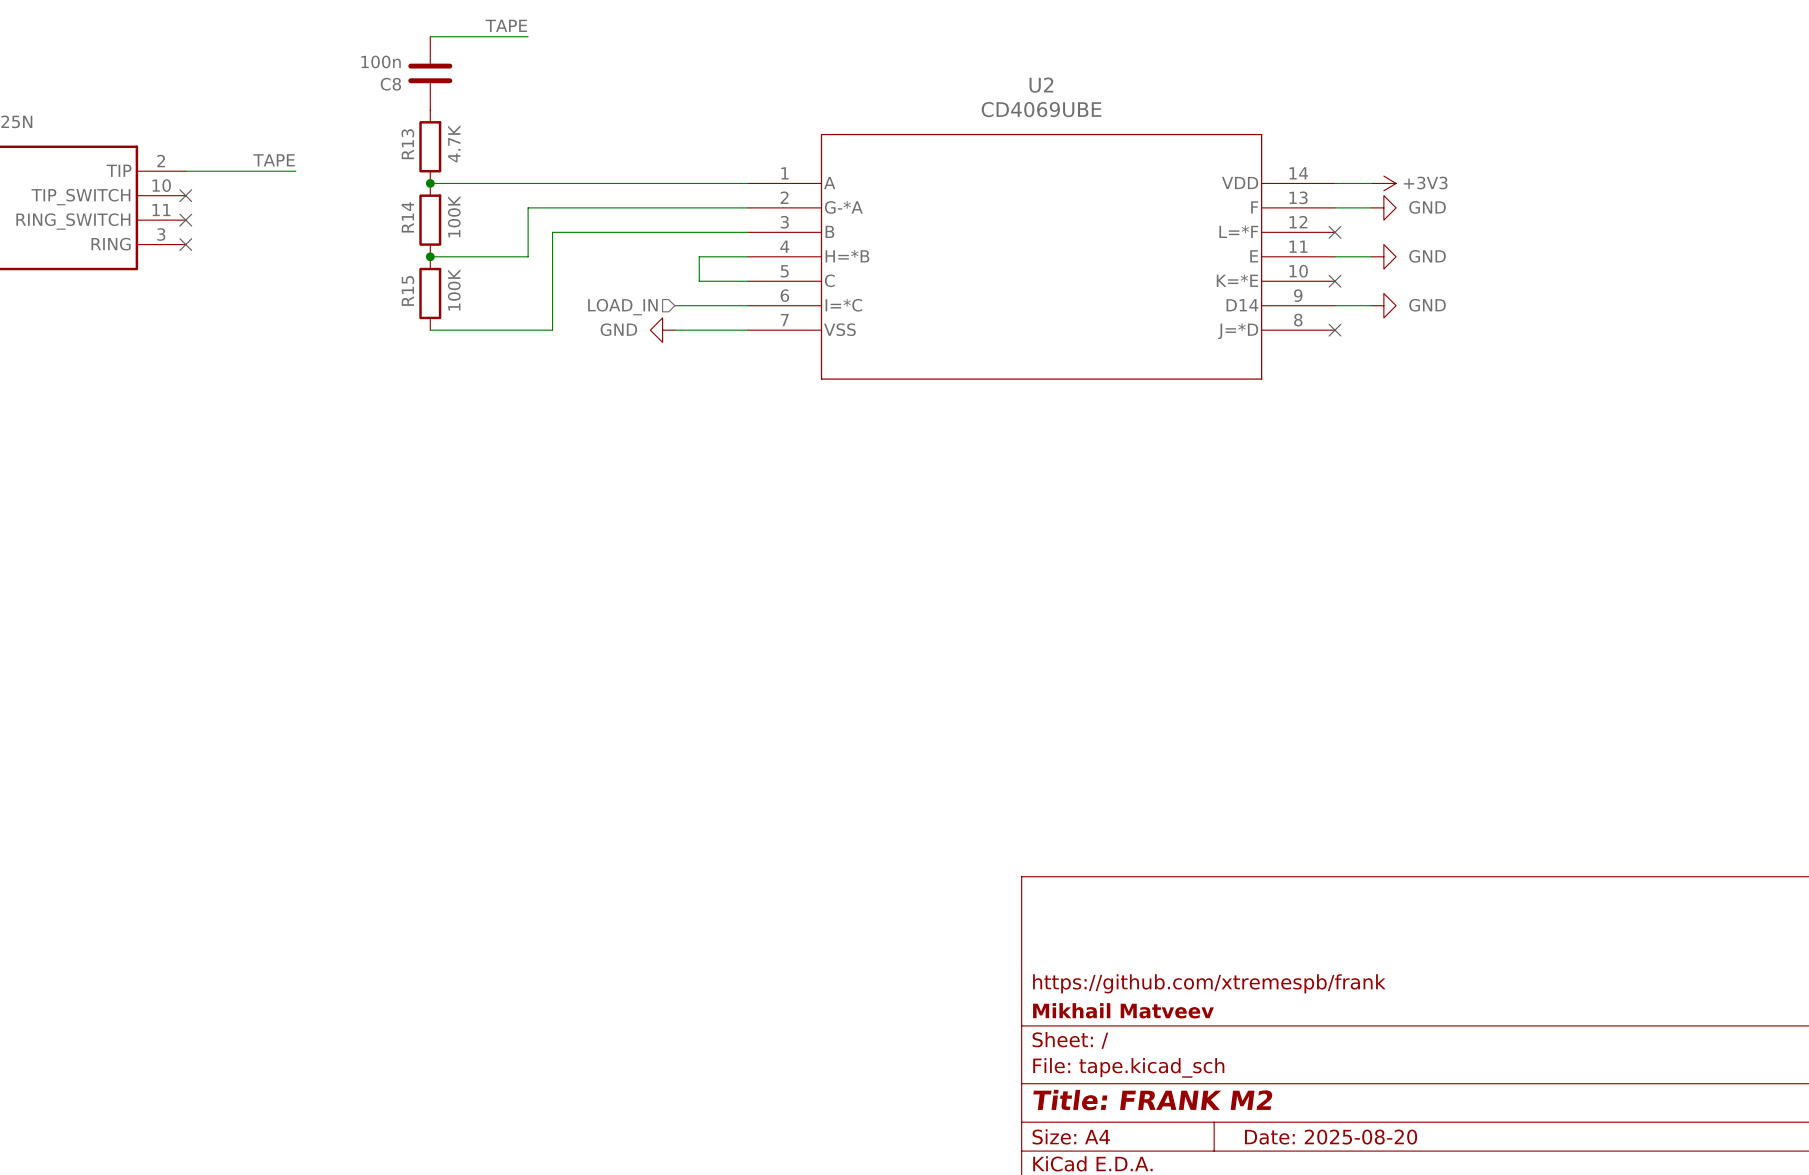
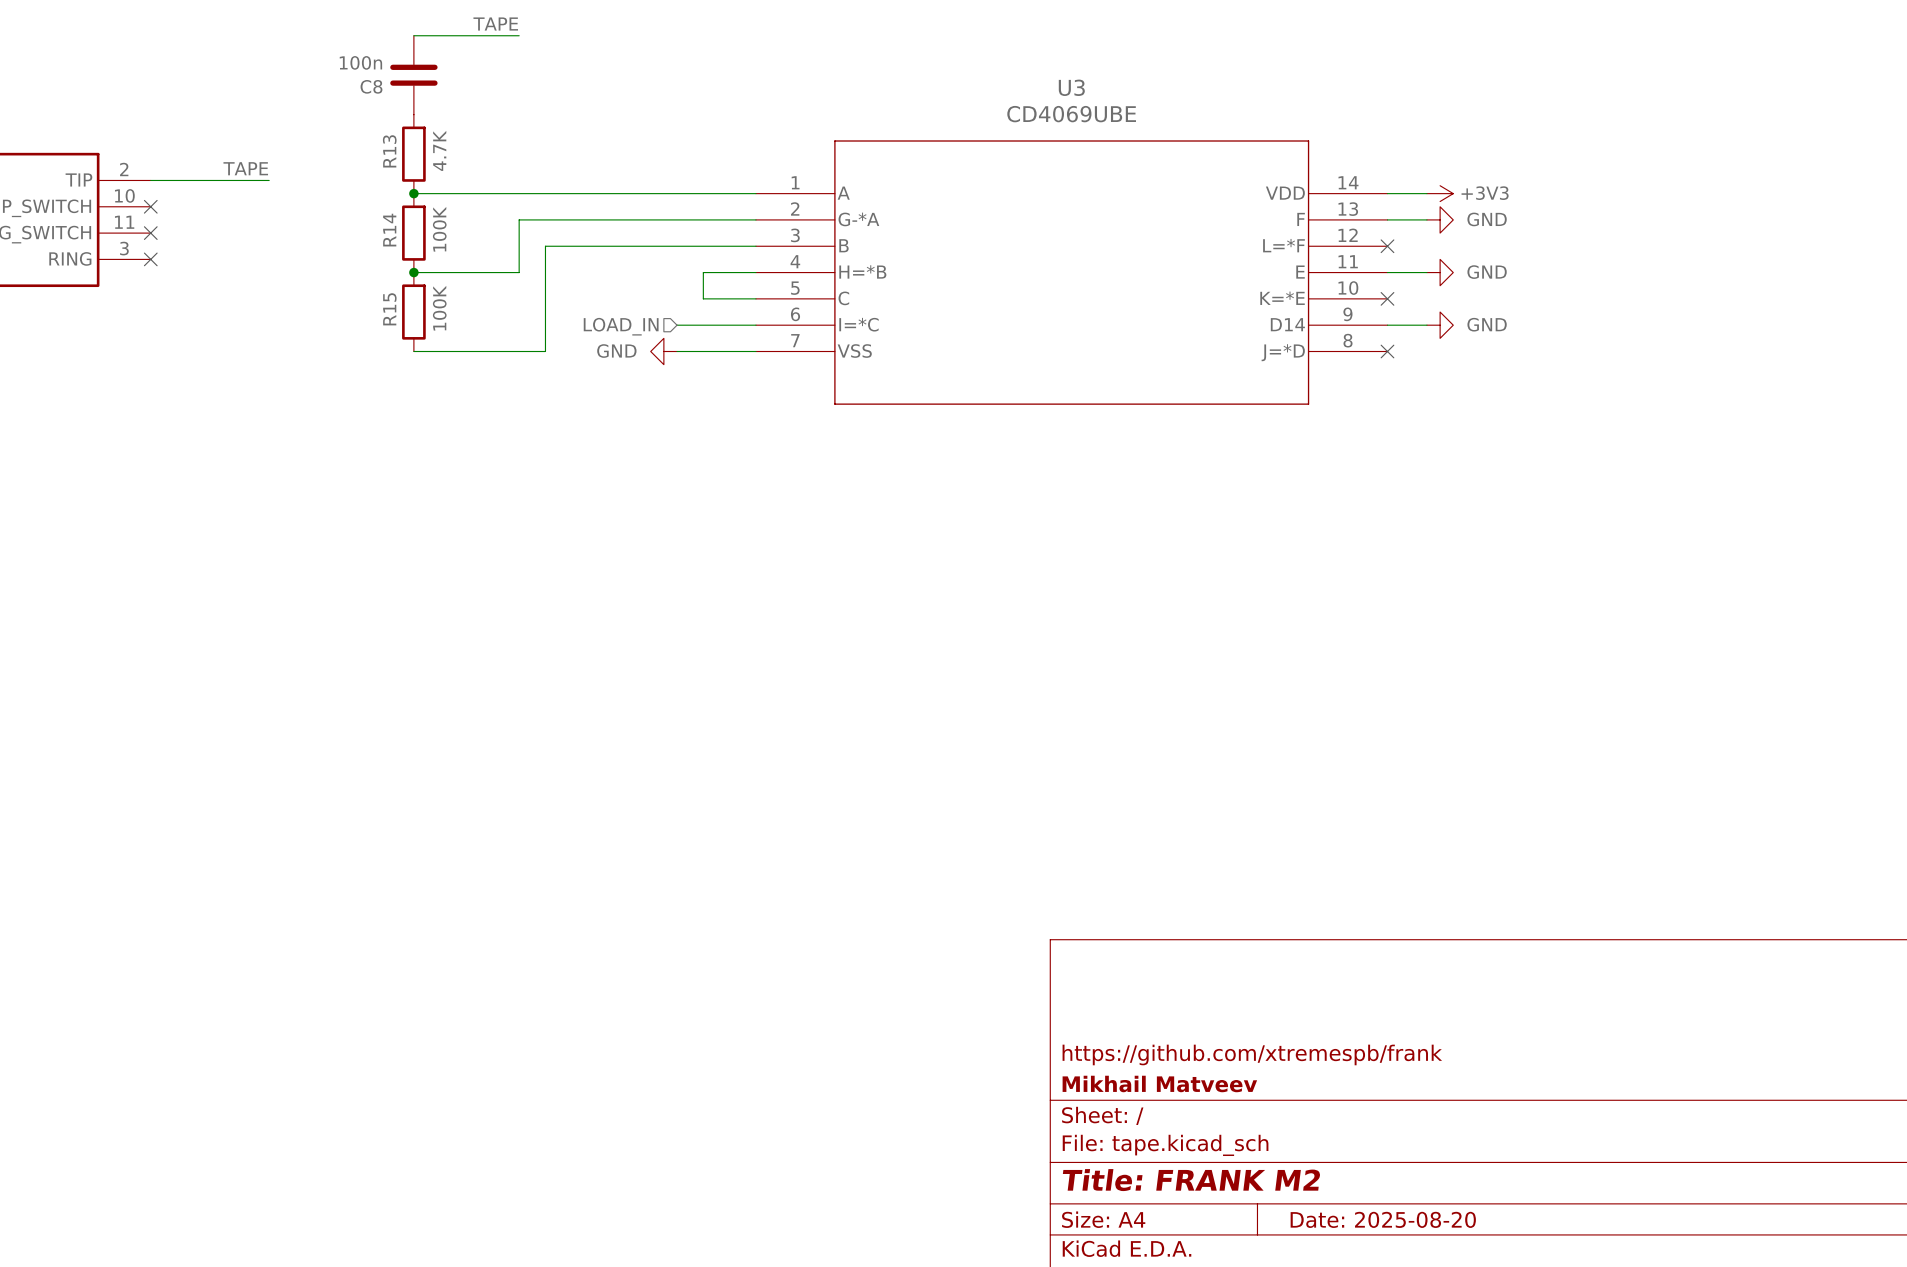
U2 name: U2 (1041, 85) -> U3 (1071, 87)

